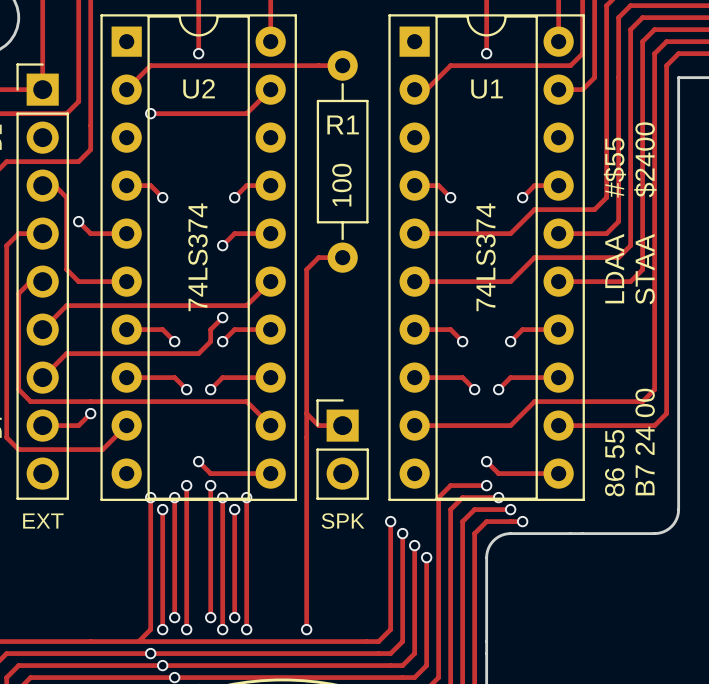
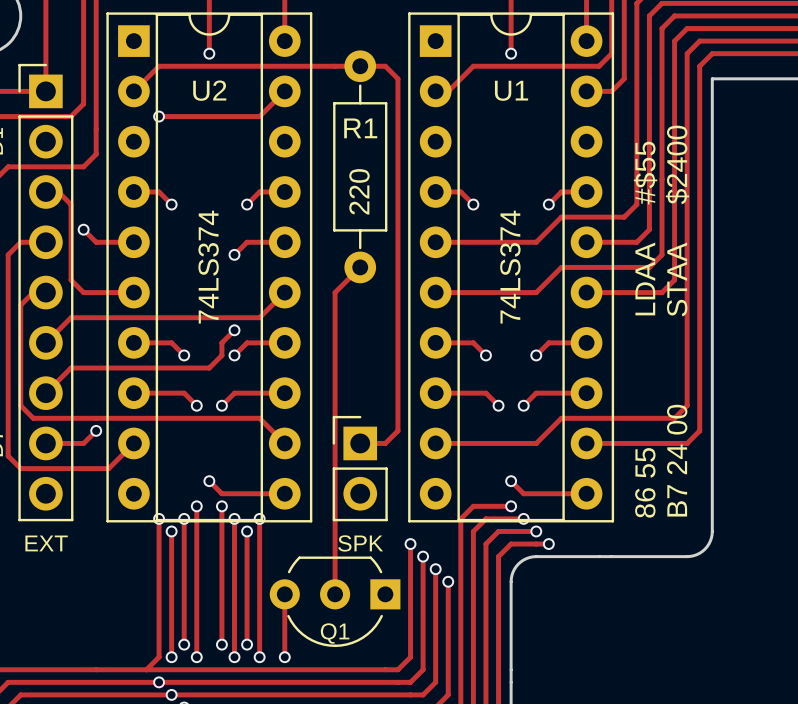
R1 value: 100 (341, 185) -> 220 (359, 191)
track: (342, 257) (318, 257) (306, 269) (306, 629) -> (360, 267) (335, 292) (335, 594)
track: (306, 413) (318, 425) (342, 425) -> (360, 66) (385, 66) (397, 78) (397, 430) (385, 443) (360, 443)
track: none -> (284, 594) (284, 657)
Q1: none -> (335, 601)
via position: (306, 629) -> (284, 657)

